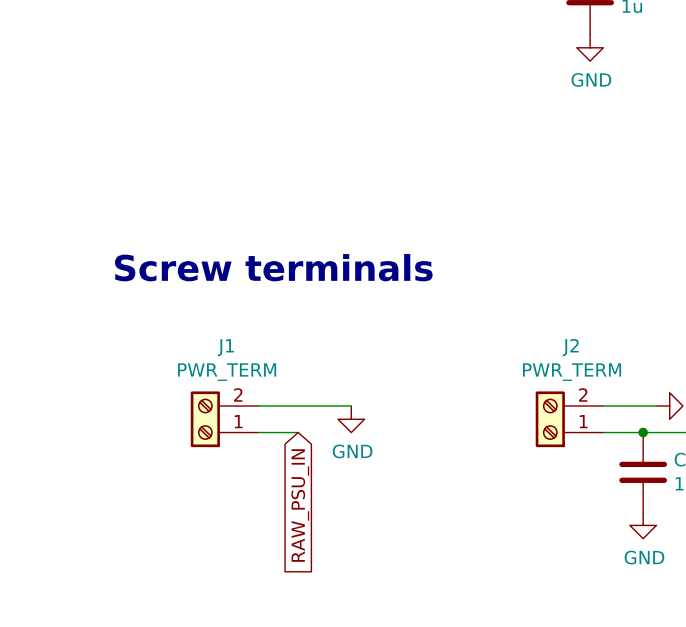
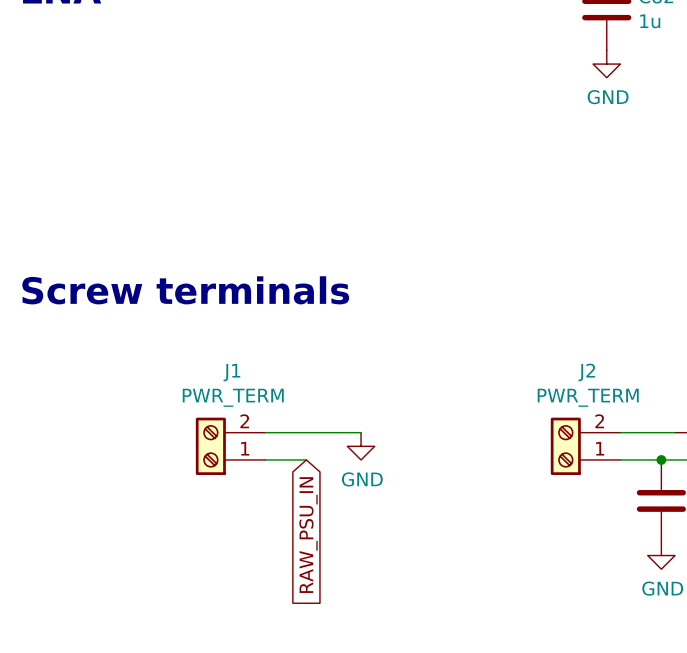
text position: Screw terminals (273, 267) -> Screw terminals (185, 290)

